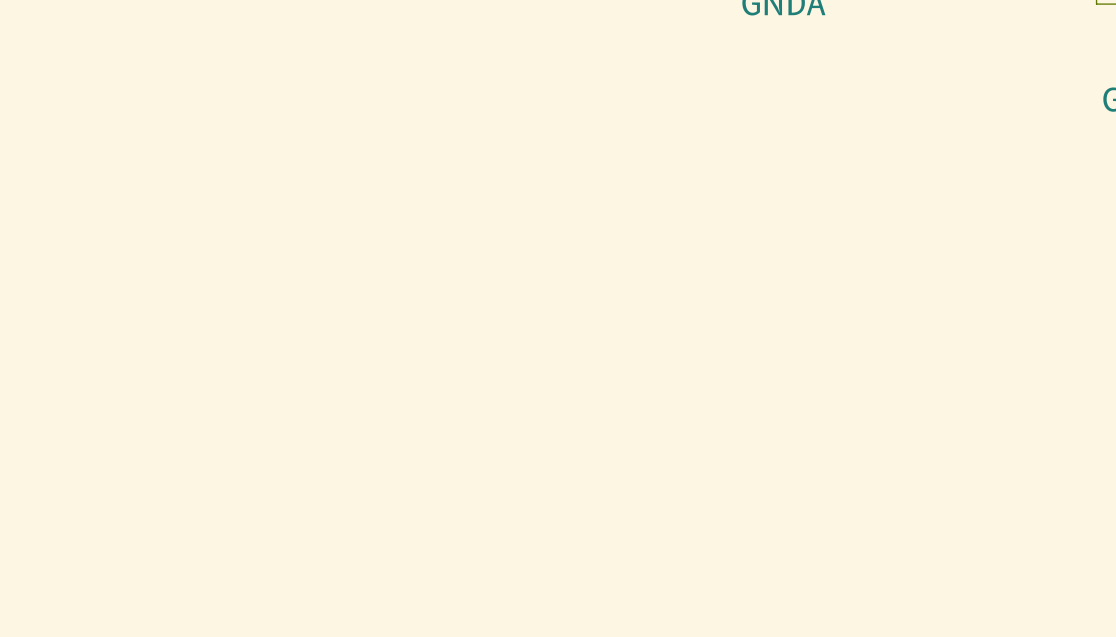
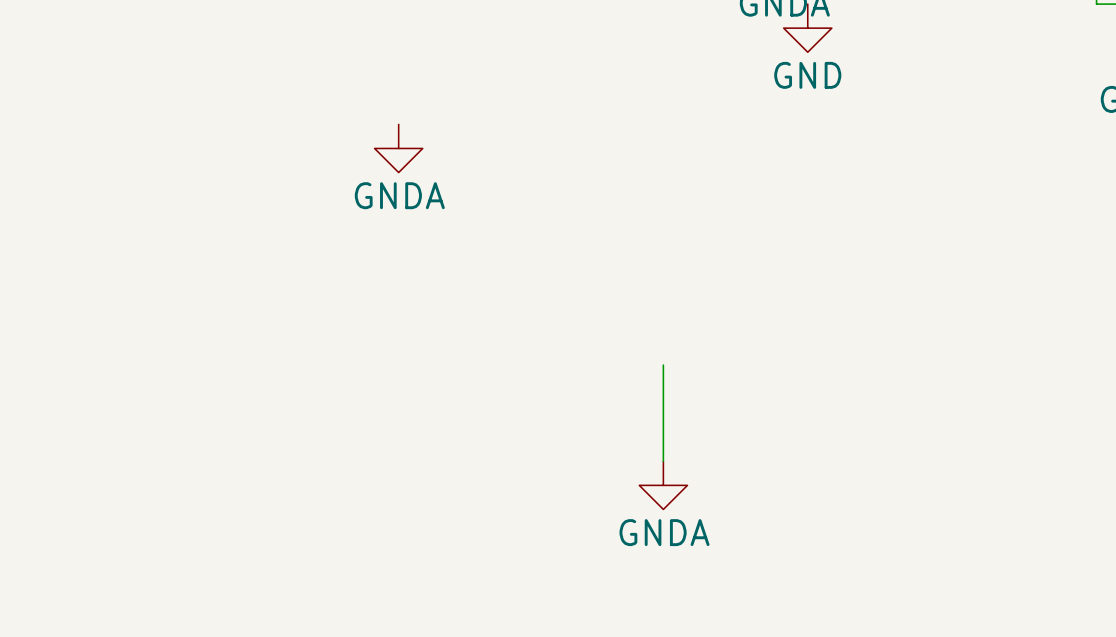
power symbol: none -> GND (807, 28)
power symbol: none -> GNDA (398, 148)
wire: none -> (663, 365) (663, 461)
power symbol: none -> GNDA (663, 485)

